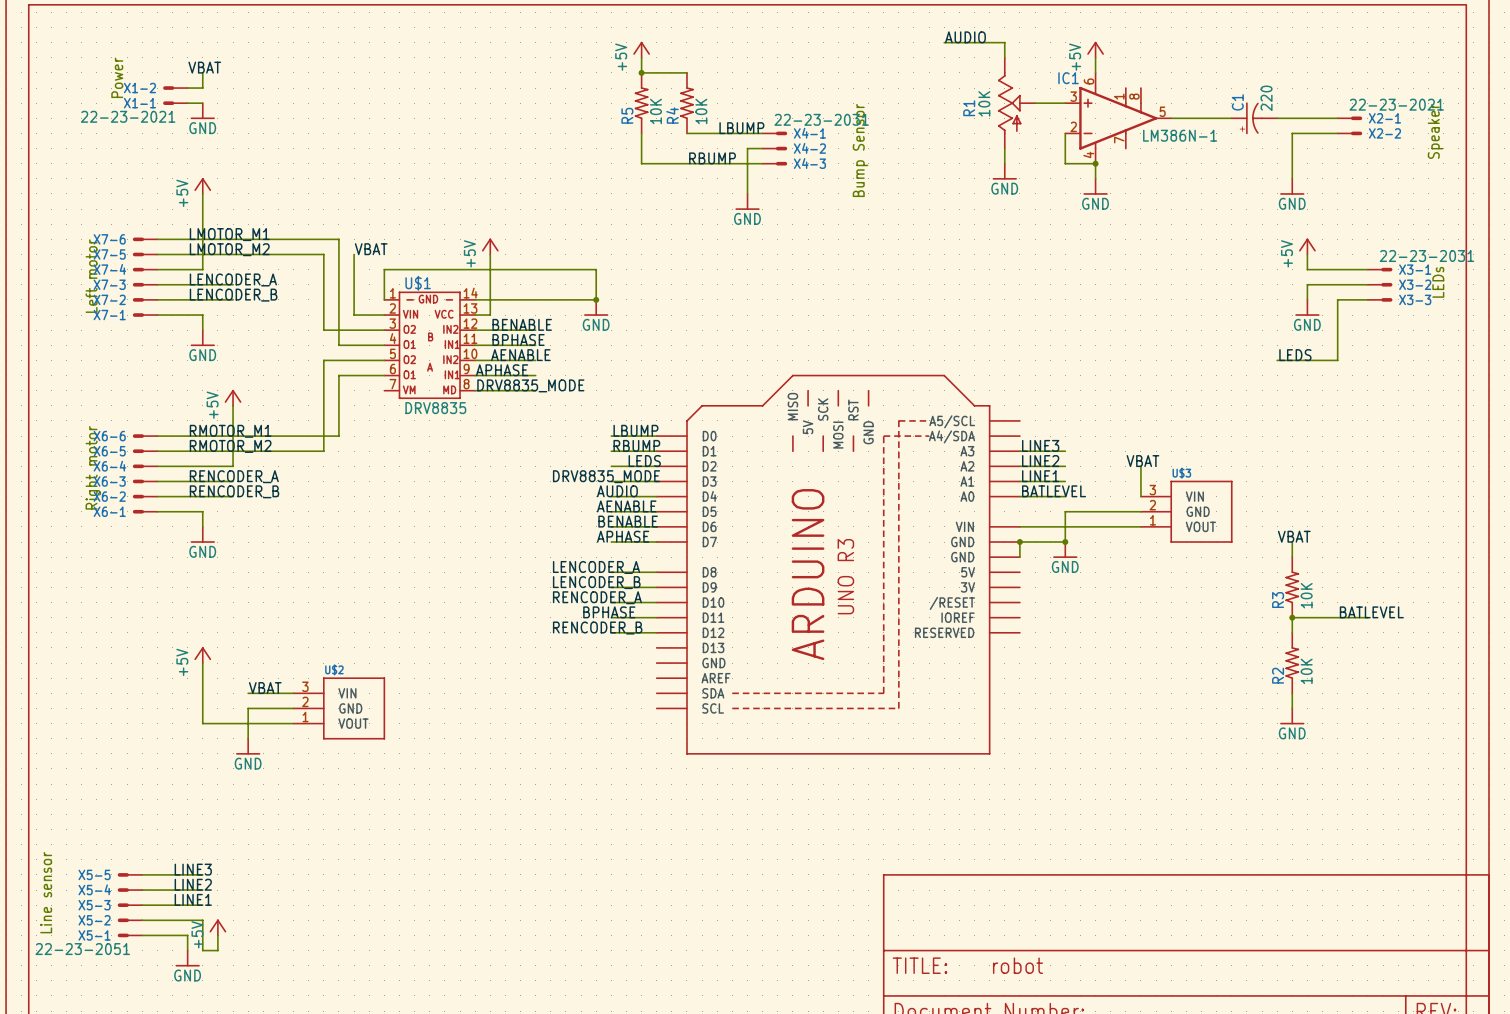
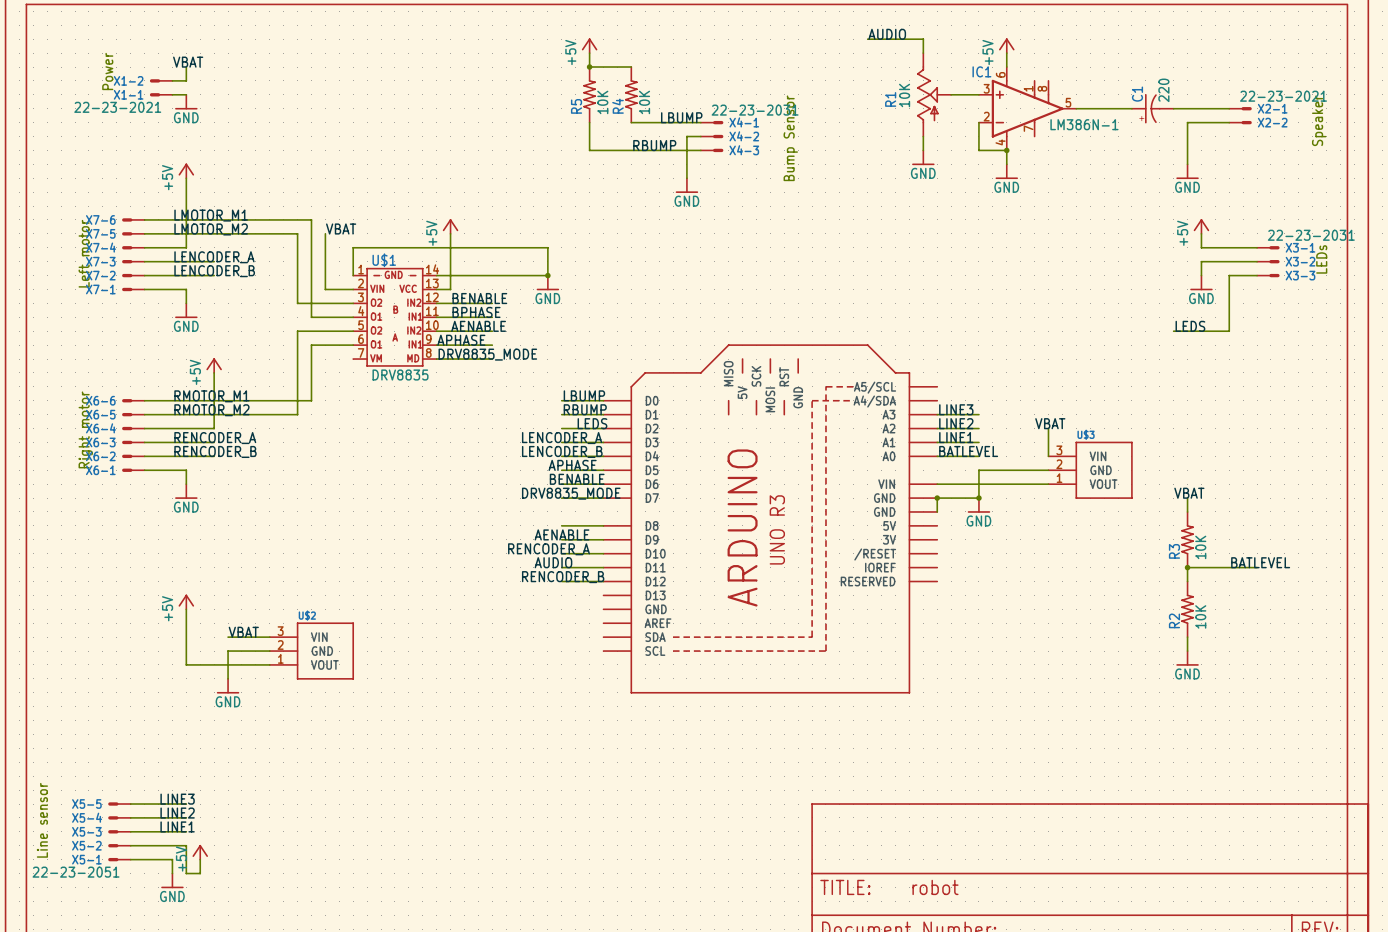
label position: DRV8835_MODE (606, 476) -> DRV8835_MODE (571, 493)
label: AUDIO (617, 491) -> none
label: AENABLE (626, 506) -> APHASE (572, 465)
label: APHASE (623, 536) -> none
label position: LENCODER_A (596, 567) -> LENCODER_A (562, 438)
label position: LENCODER_B (596, 582) -> LENCODER_B (562, 451)
label: none -> AENABLE (562, 534)
label: BPHASE (609, 612) -> AUDIO (553, 562)
label position: RENCODER_B (597, 628) -> RENCODER_B (563, 577)

